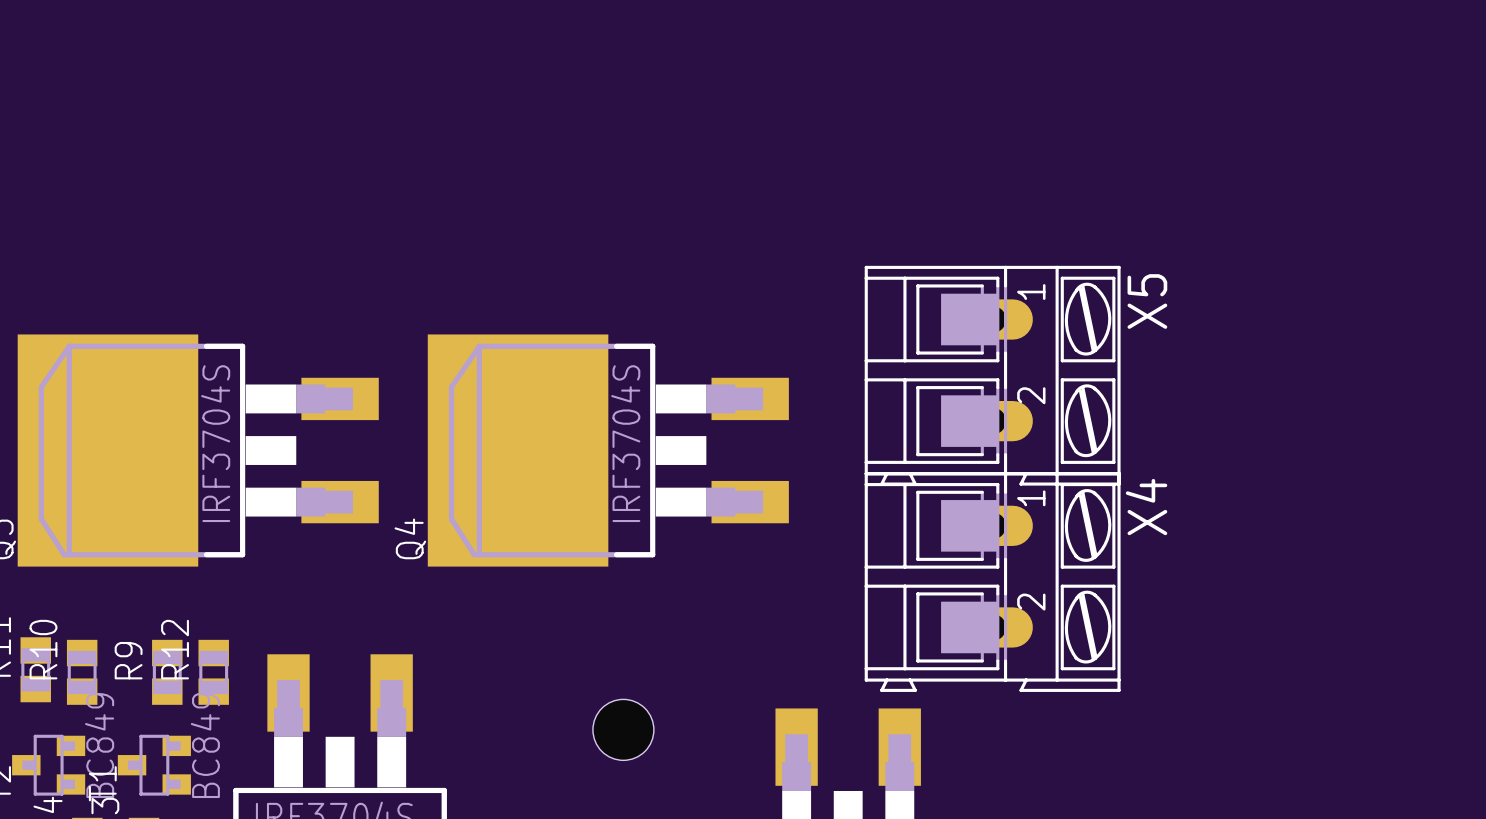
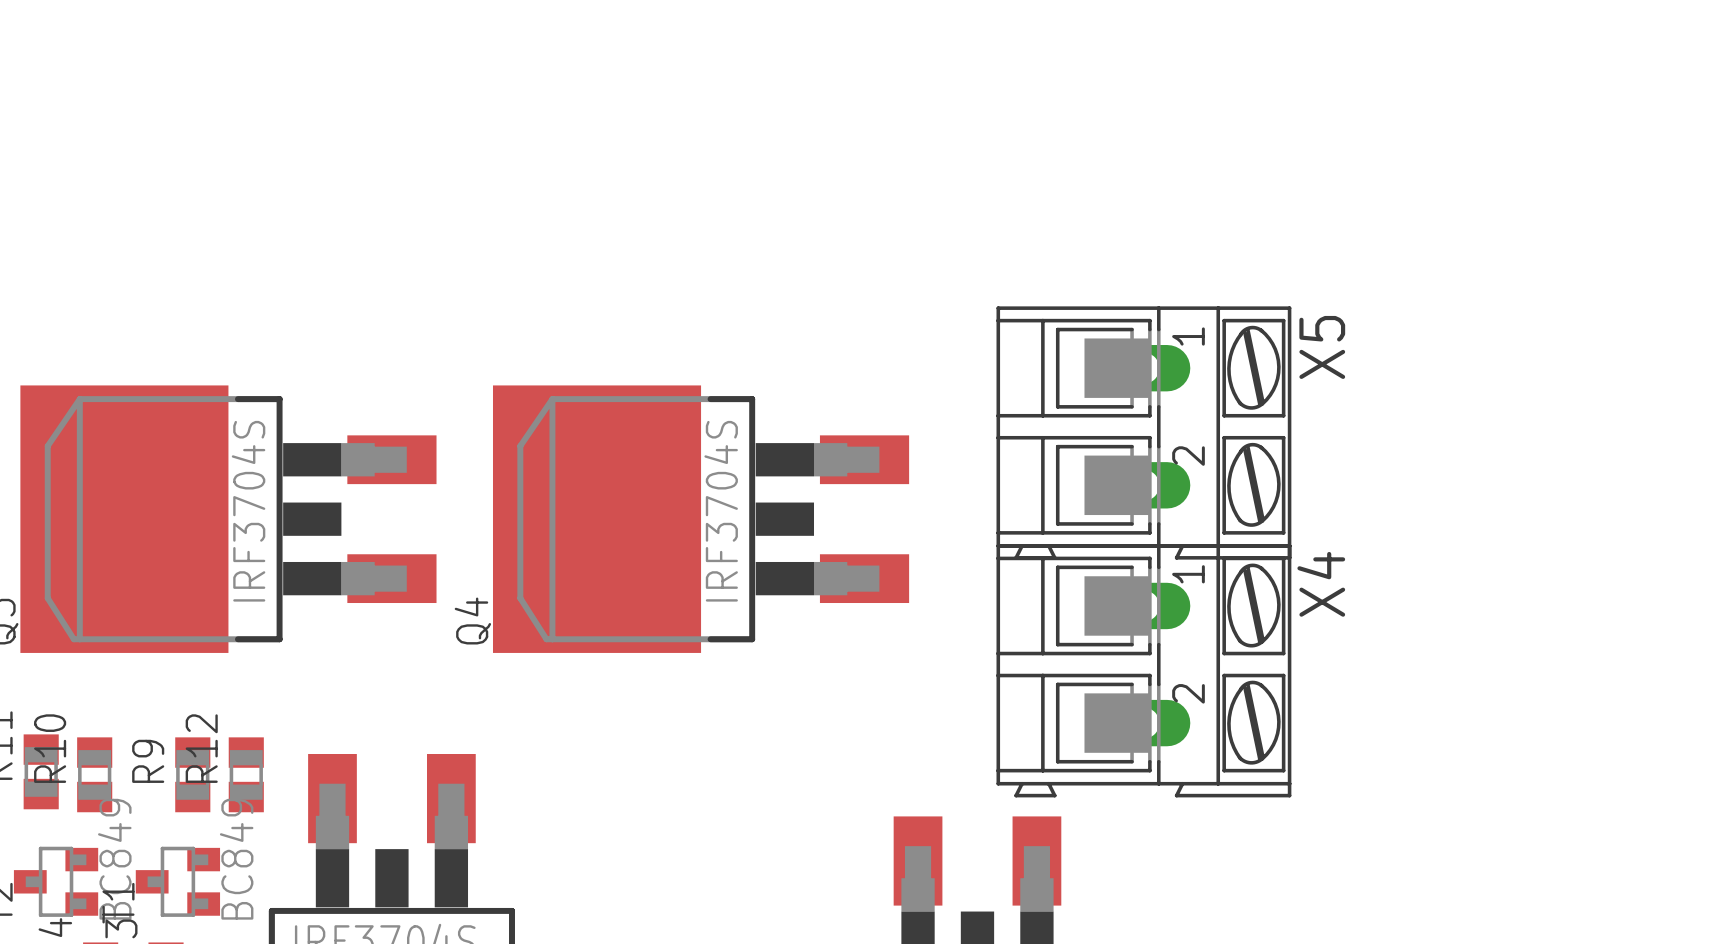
hole: (623, 729) -> none

